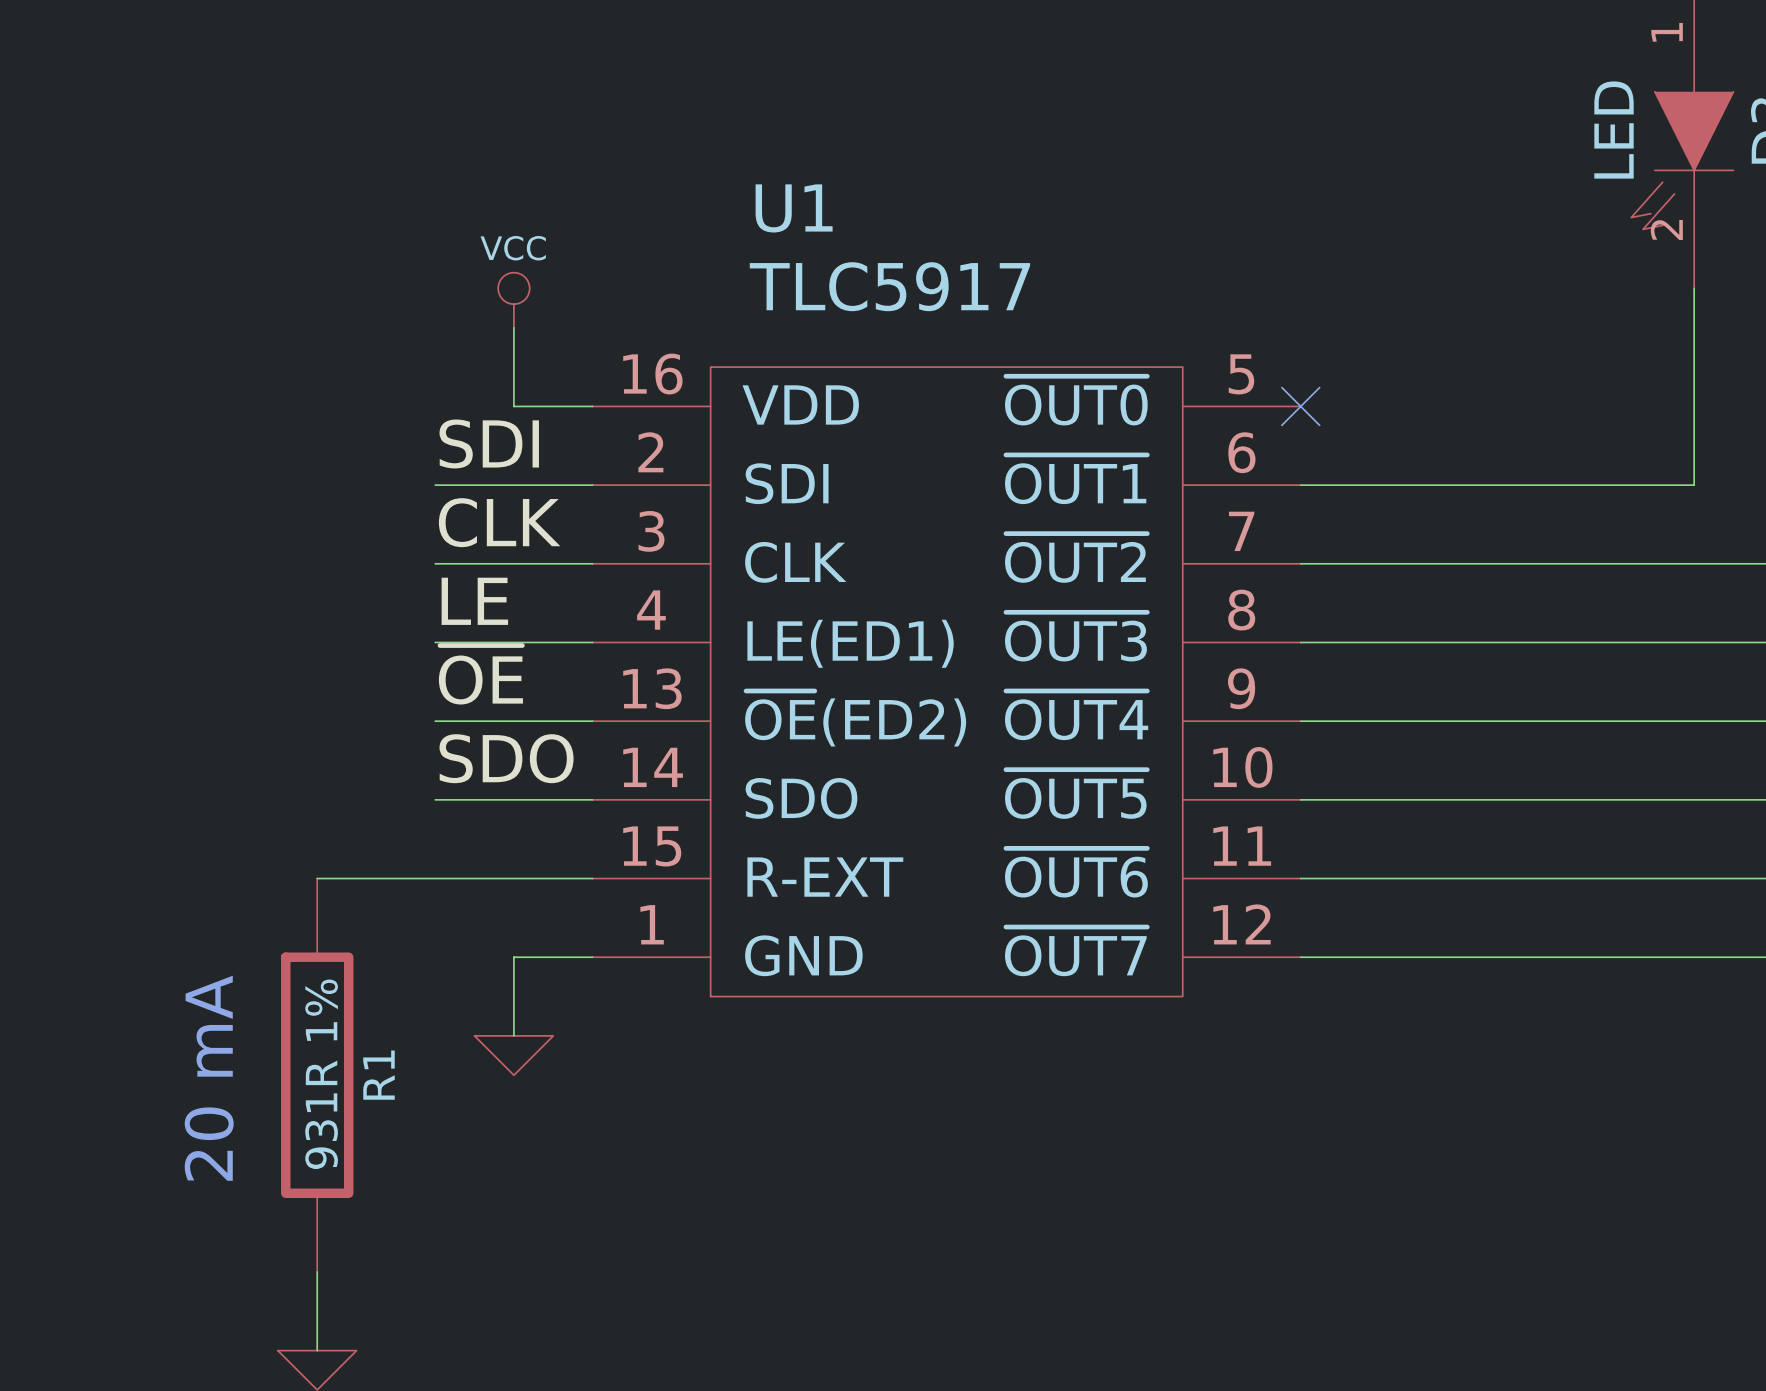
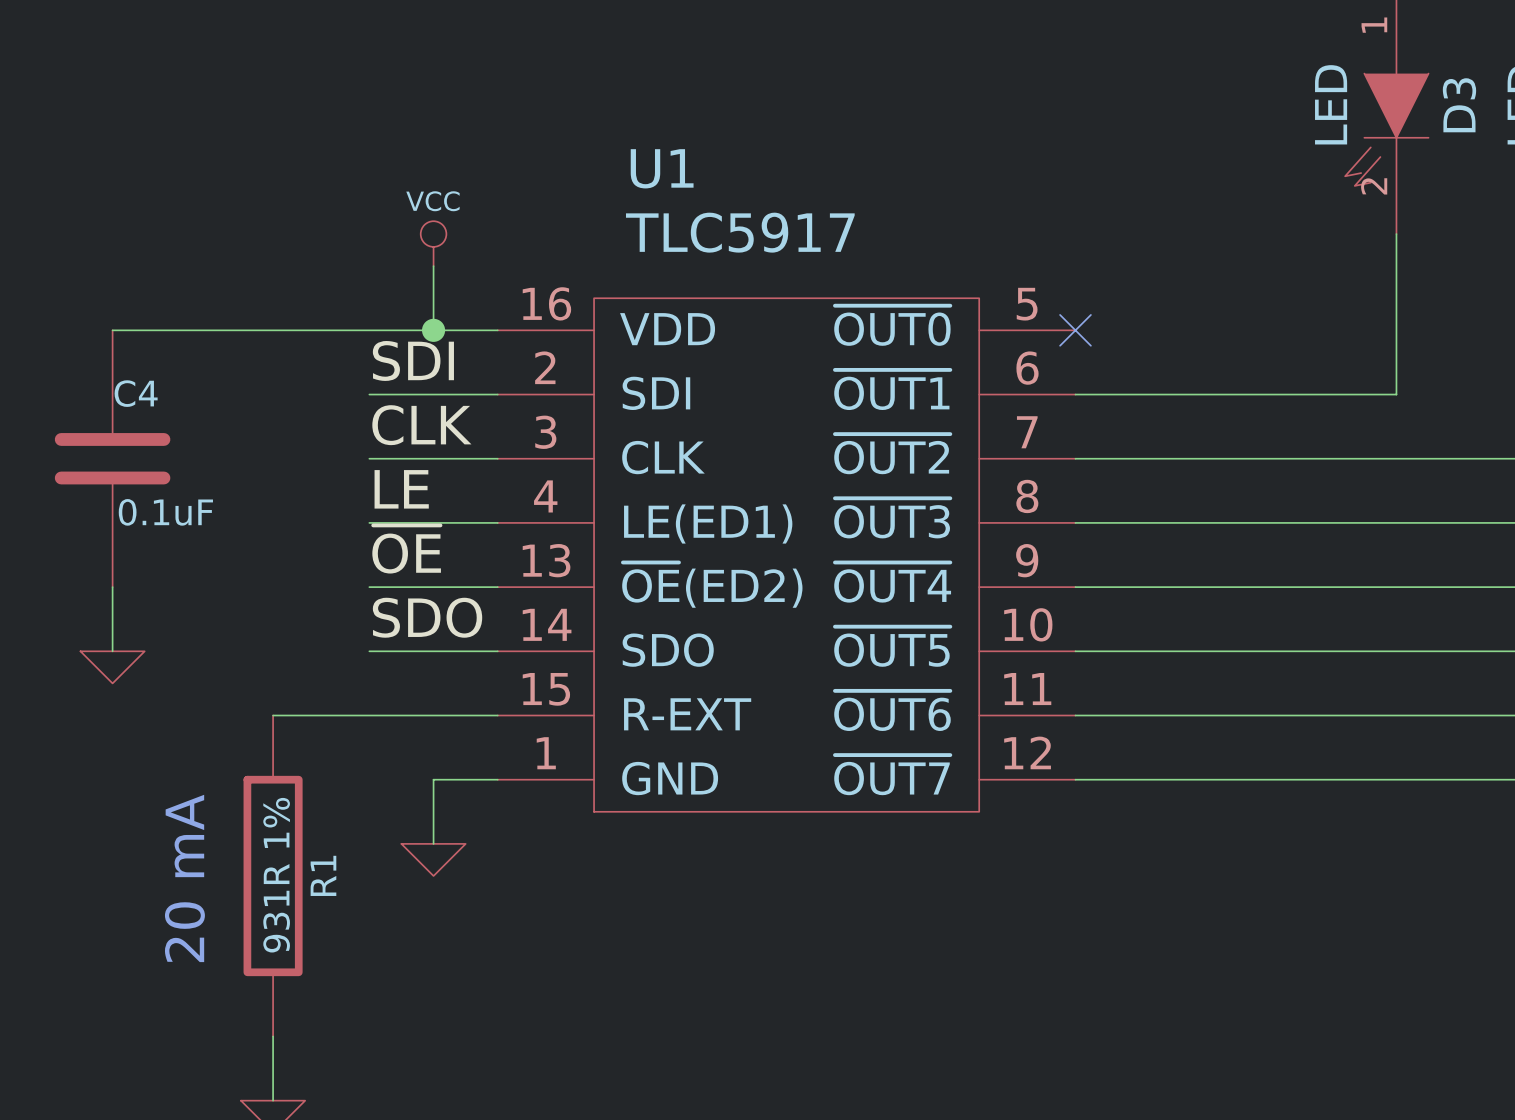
wire: none -> (112, 330) (433, 330)
junction: none -> (433, 330)
C4: none -> 0.1uF (112, 458)
wire: none -> (112, 587) (112, 651)
power symbol: none -> (112, 667)

